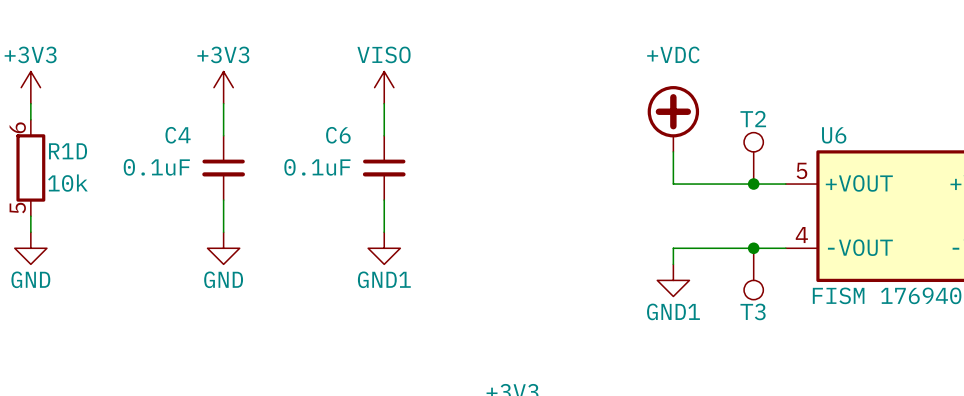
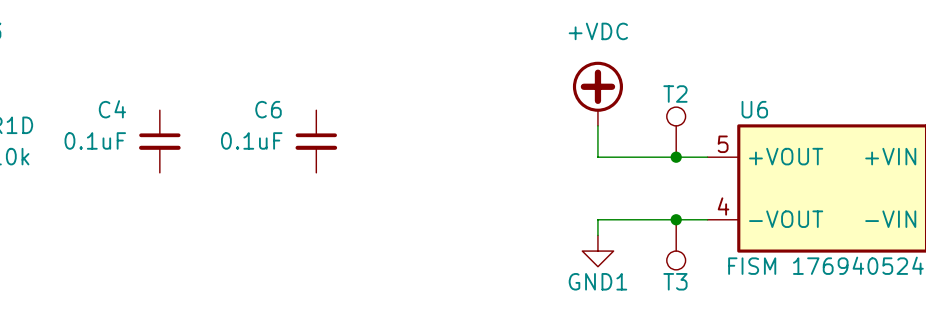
power symbol: +3V3 (223, 87) -> none
power symbol: VISO (384, 87) -> none
wire: (223, 103) (223, 135) -> none
wire: (384, 103) (384, 135) -> none
wire: (223, 200) (223, 232) -> none
wire: (384, 200) (384, 232) -> none
power symbol: GND (223, 248) -> none
power symbol: GND1 (384, 248) -> none

